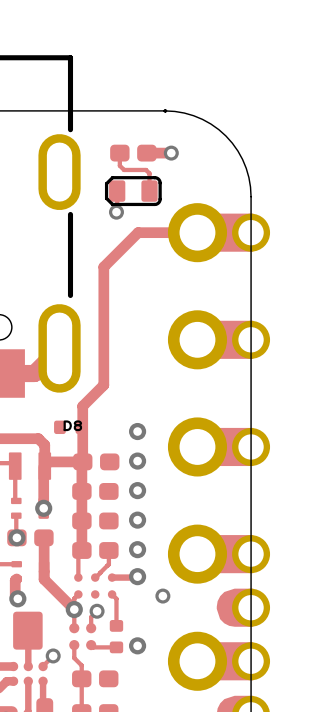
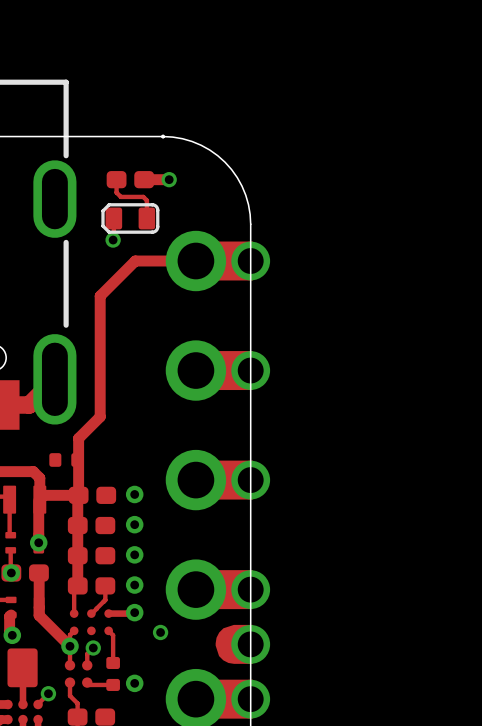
D8 name: D8 (72, 425) -> none
via: (137, 431) -> none

